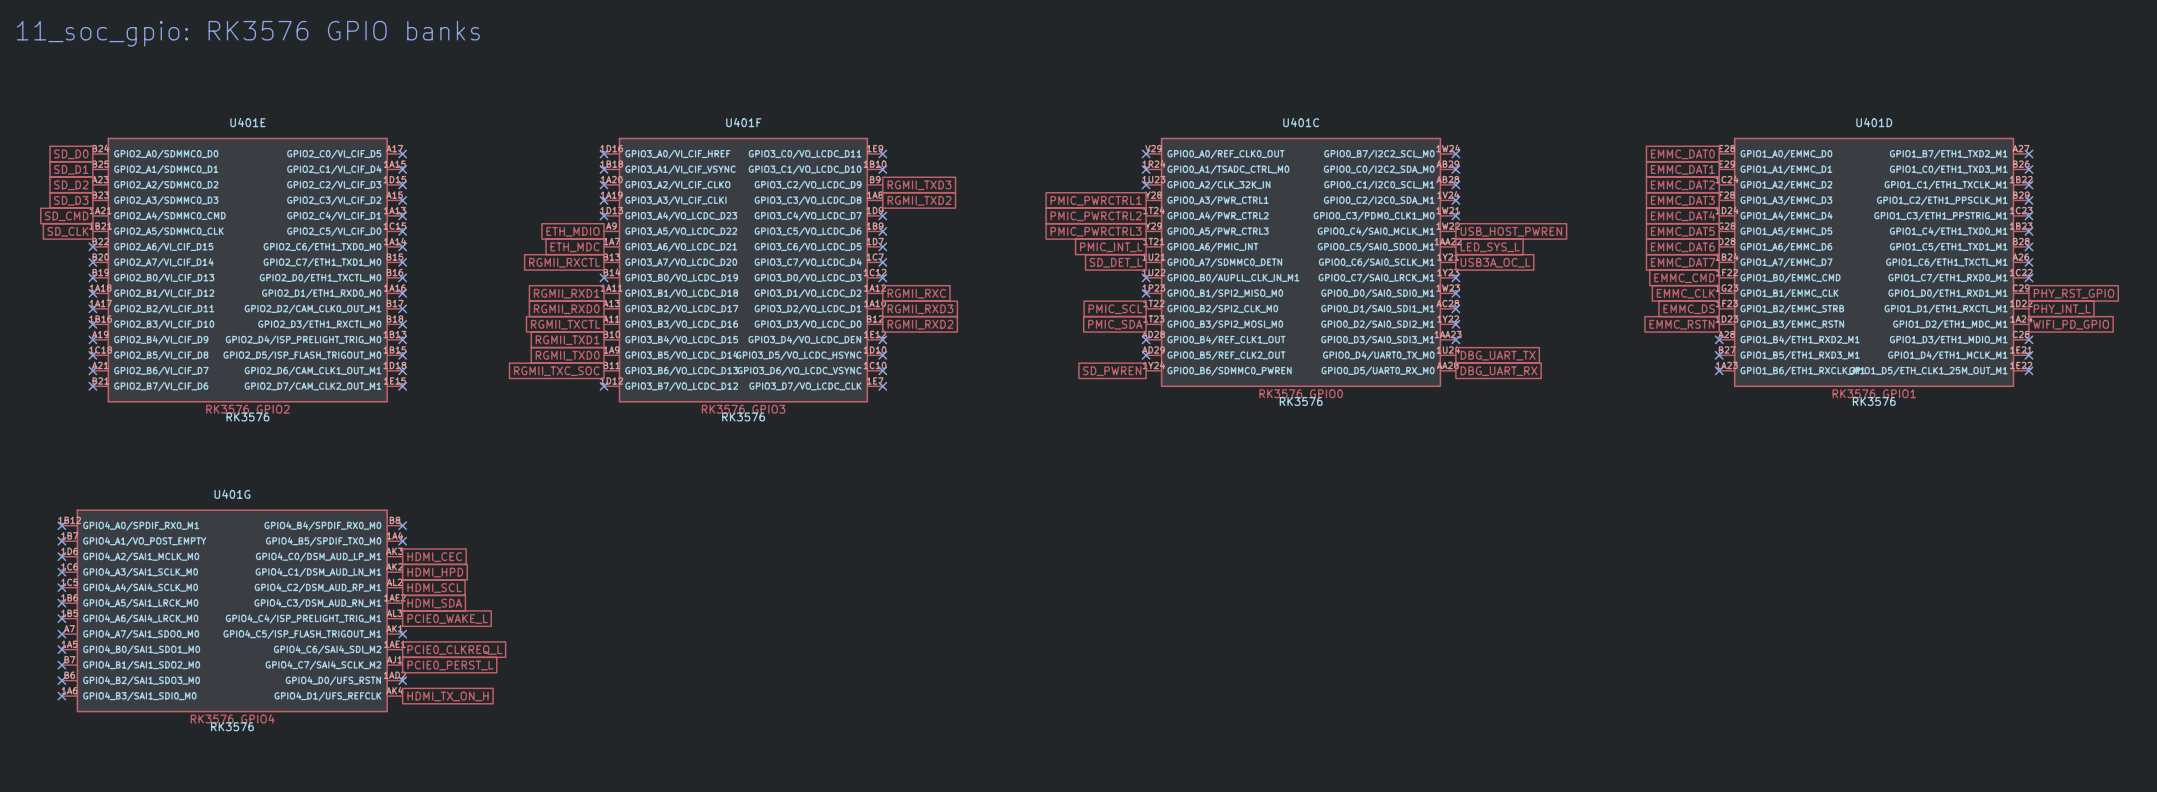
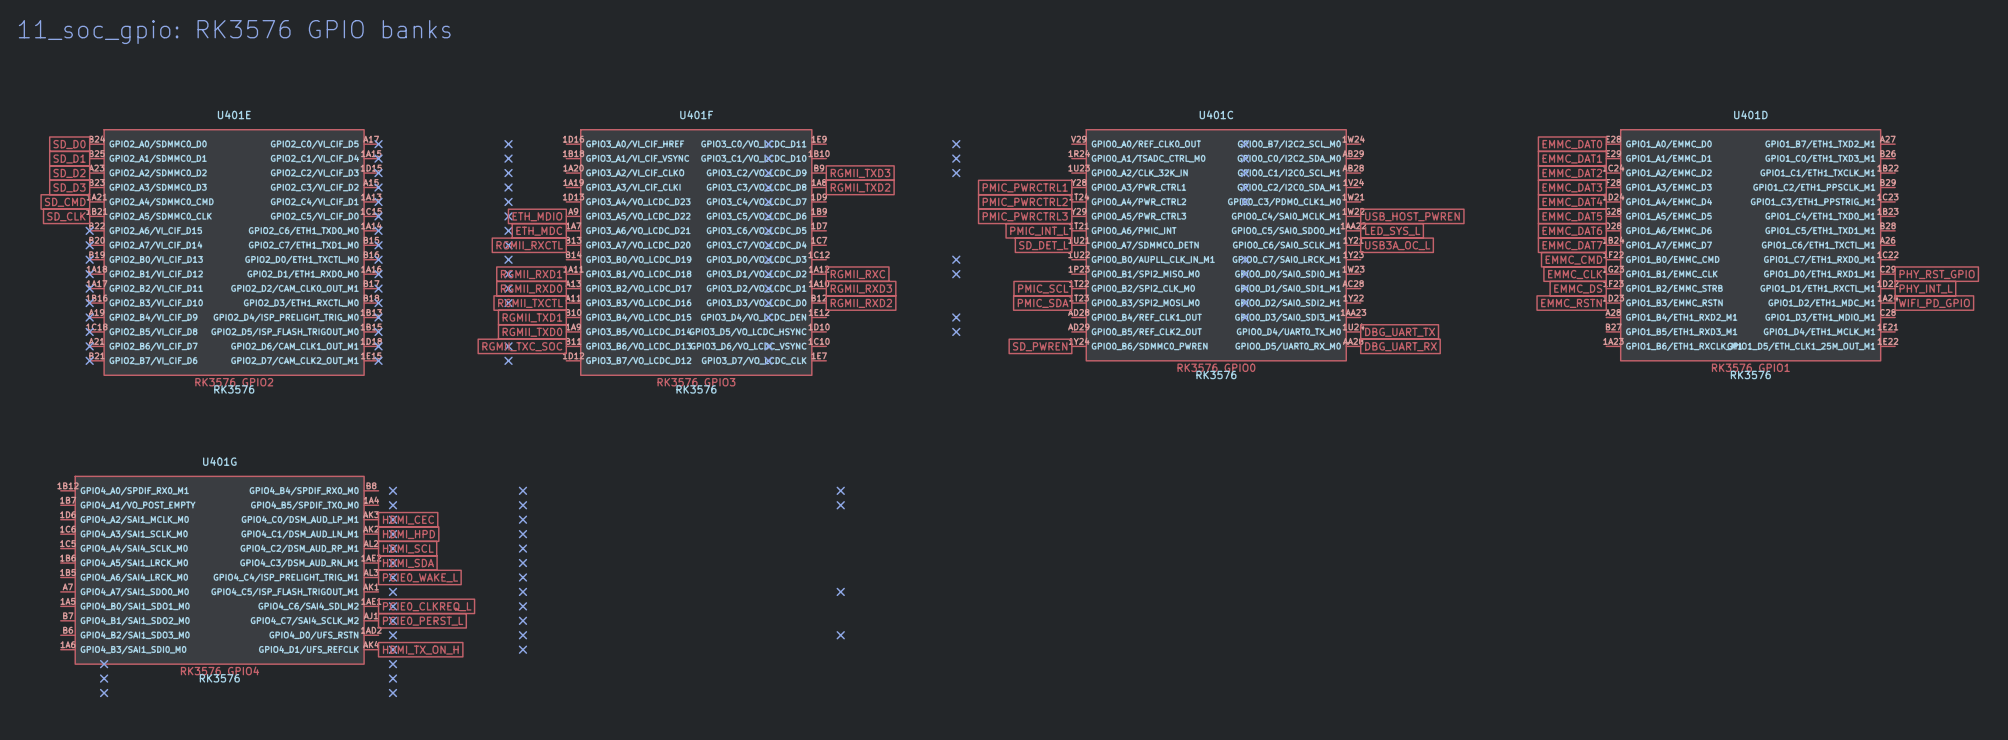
no-connect mark: none -> (508, 144)
no-connect mark: (604, 153) -> none
no-connect mark: none -> (768, 144)
no-connect mark: (882, 153) -> none
no-connect mark: none -> (956, 144)
no-connect mark: (1146, 153) -> none
no-connect mark: none -> (1245, 144)
no-connect mark: (1455, 153) -> none
no-connect mark: (2028, 153) -> none
no-connect mark: none -> (508, 158)
no-connect mark: (604, 169) -> none
no-connect mark: none -> (768, 158)
no-connect mark: (882, 169) -> none
no-connect mark: none -> (956, 158)
no-connect mark: (1146, 169) -> none
no-connect mark: none -> (1245, 158)
no-connect mark: (1455, 169) -> none
no-connect mark: (2028, 169) -> none
no-connect mark: none -> (508, 173)
no-connect mark: (604, 184) -> none
no-connect mark: none -> (768, 173)
no-connect mark: none -> (956, 173)
no-connect mark: (1146, 184) -> none
no-connect mark: none -> (1245, 173)
no-connect mark: (1455, 184) -> none
no-connect mark: (2028, 184) -> none
no-connect mark: none -> (508, 187)
no-connect mark: (604, 200) -> none
no-connect mark: none -> (768, 187)
no-connect mark: none -> (1245, 187)
no-connect mark: (1455, 200) -> none
no-connect mark: (2028, 200) -> none
no-connect mark: none -> (508, 201)
no-connect mark: (604, 215) -> none
no-connect mark: none -> (768, 201)
no-connect mark: (882, 215) -> none
no-connect mark: none -> (1245, 201)
no-connect mark: (1455, 215) -> none
no-connect mark: (2028, 215) -> none
no-connect mark: none -> (508, 216)
no-connect mark: none -> (768, 216)
no-connect mark: (882, 231) -> none
no-connect mark: (2028, 231) -> none
no-connect mark: none -> (508, 230)
no-connect mark: none -> (768, 230)
no-connect mark: (882, 246) -> none
no-connect mark: (2028, 246) -> none
no-connect mark: none -> (508, 245)
no-connect mark: none -> (768, 245)
no-connect mark: (882, 262) -> none
no-connect mark: (2028, 262) -> none
no-connect mark: none -> (508, 259)
no-connect mark: (604, 277) -> none
no-connect mark: none -> (768, 259)
no-connect mark: (882, 277) -> none
no-connect mark: none -> (956, 259)
no-connect mark: (1146, 277) -> none
no-connect mark: none -> (1245, 259)
no-connect mark: (1455, 277) -> none
no-connect mark: (2028, 277) -> none
no-connect mark: none -> (508, 274)
no-connect mark: none -> (768, 274)
no-connect mark: none -> (956, 274)
no-connect mark: (1146, 293) -> none
no-connect mark: none -> (1245, 274)
no-connect mark: (1455, 293) -> none
no-connect mark: none -> (508, 288)
no-connect mark: none -> (768, 288)
no-connect mark: none -> (1245, 288)
no-connect mark: (1455, 308) -> none
no-connect mark: none -> (508, 303)
no-connect mark: none -> (768, 303)
no-connect mark: none -> (1245, 303)
no-connect mark: (1455, 324) -> none
no-connect mark: none -> (768, 317)
no-connect mark: (882, 339) -> none
no-connect mark: none -> (956, 317)
no-connect mark: (1146, 339) -> none
no-connect mark: none -> (1245, 317)
no-connect mark: (1455, 339) -> none
no-connect mark: (1719, 339) -> none
no-connect mark: (2028, 339) -> none
no-connect mark: (882, 355) -> none
no-connect mark: none -> (956, 331)
no-connect mark: (1146, 355) -> none
no-connect mark: (1719, 355) -> none
no-connect mark: (2028, 355) -> none
no-connect mark: none -> (508, 346)
no-connect mark: none -> (768, 346)
no-connect mark: (882, 370) -> none
no-connect mark: (1719, 370) -> none
no-connect mark: (2028, 370) -> none
no-connect mark: none -> (508, 360)
no-connect mark: (604, 386) -> none
no-connect mark: none -> (768, 360)
no-connect mark: (882, 386) -> none
no-connect mark: (61, 525) -> none
no-connect mark: (402, 525) -> none
no-connect mark: none -> (392, 490)
no-connect mark: none -> (522, 490)
no-connect mark: none -> (840, 490)
no-connect mark: (61, 541) -> none
no-connect mark: (402, 541) -> none
no-connect mark: none -> (392, 505)
no-connect mark: none -> (522, 505)
no-connect mark: none -> (840, 505)
no-connect mark: (61, 556) -> none
no-connect mark: none -> (392, 519)
no-connect mark: none -> (522, 519)
no-connect mark: (61, 572) -> none
no-connect mark: none -> (392, 534)
no-connect mark: none -> (522, 534)
no-connect mark: (61, 587) -> none
no-connect mark: none -> (392, 548)
no-connect mark: none -> (522, 548)
no-connect mark: (61, 603) -> none
no-connect mark: none -> (392, 563)
no-connect mark: none -> (522, 563)
no-connect mark: (61, 618) -> none
no-connect mark: none -> (392, 577)
no-connect mark: none -> (522, 577)
no-connect mark: (61, 634) -> none
no-connect mark: (402, 634) -> none
no-connect mark: none -> (392, 591)
no-connect mark: none -> (522, 591)
no-connect mark: none -> (840, 591)
no-connect mark: (61, 649) -> none
no-connect mark: none -> (392, 606)
no-connect mark: none -> (522, 606)
no-connect mark: (61, 665) -> none
no-connect mark: none -> (392, 620)
no-connect mark: none -> (522, 620)
no-connect mark: (61, 680) -> none
no-connect mark: (402, 680) -> none
no-connect mark: none -> (392, 635)
no-connect mark: none -> (522, 635)
no-connect mark: none -> (840, 635)
no-connect mark: (61, 696) -> none
no-connect mark: none -> (392, 649)
no-connect mark: none -> (522, 649)
no-connect mark: none -> (104, 664)
no-connect mark: none -> (392, 664)
no-connect mark: none -> (104, 678)
no-connect mark: none -> (392, 678)
no-connect mark: none -> (104, 693)
no-connect mark: none -> (392, 693)

